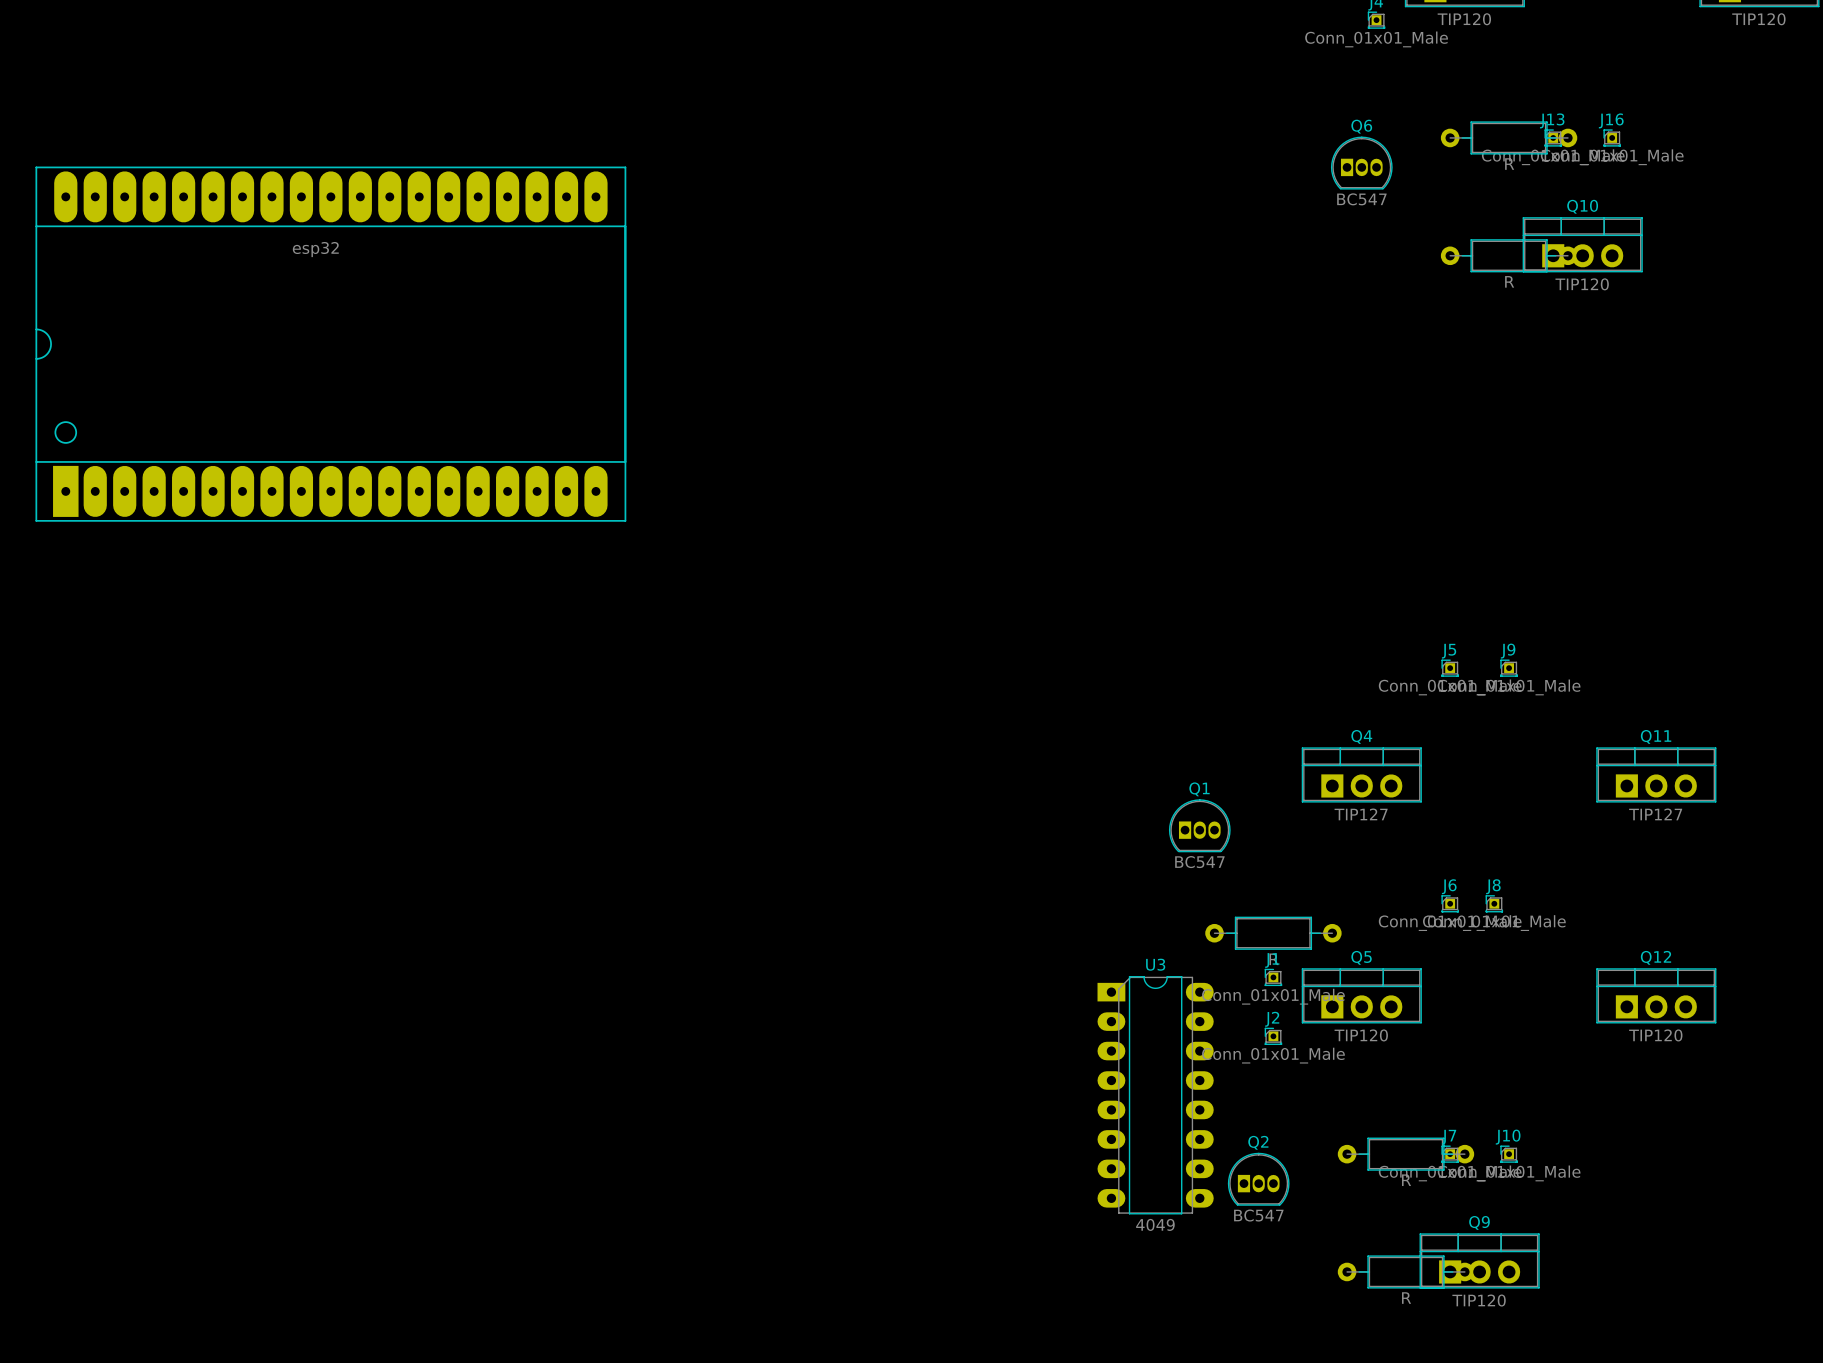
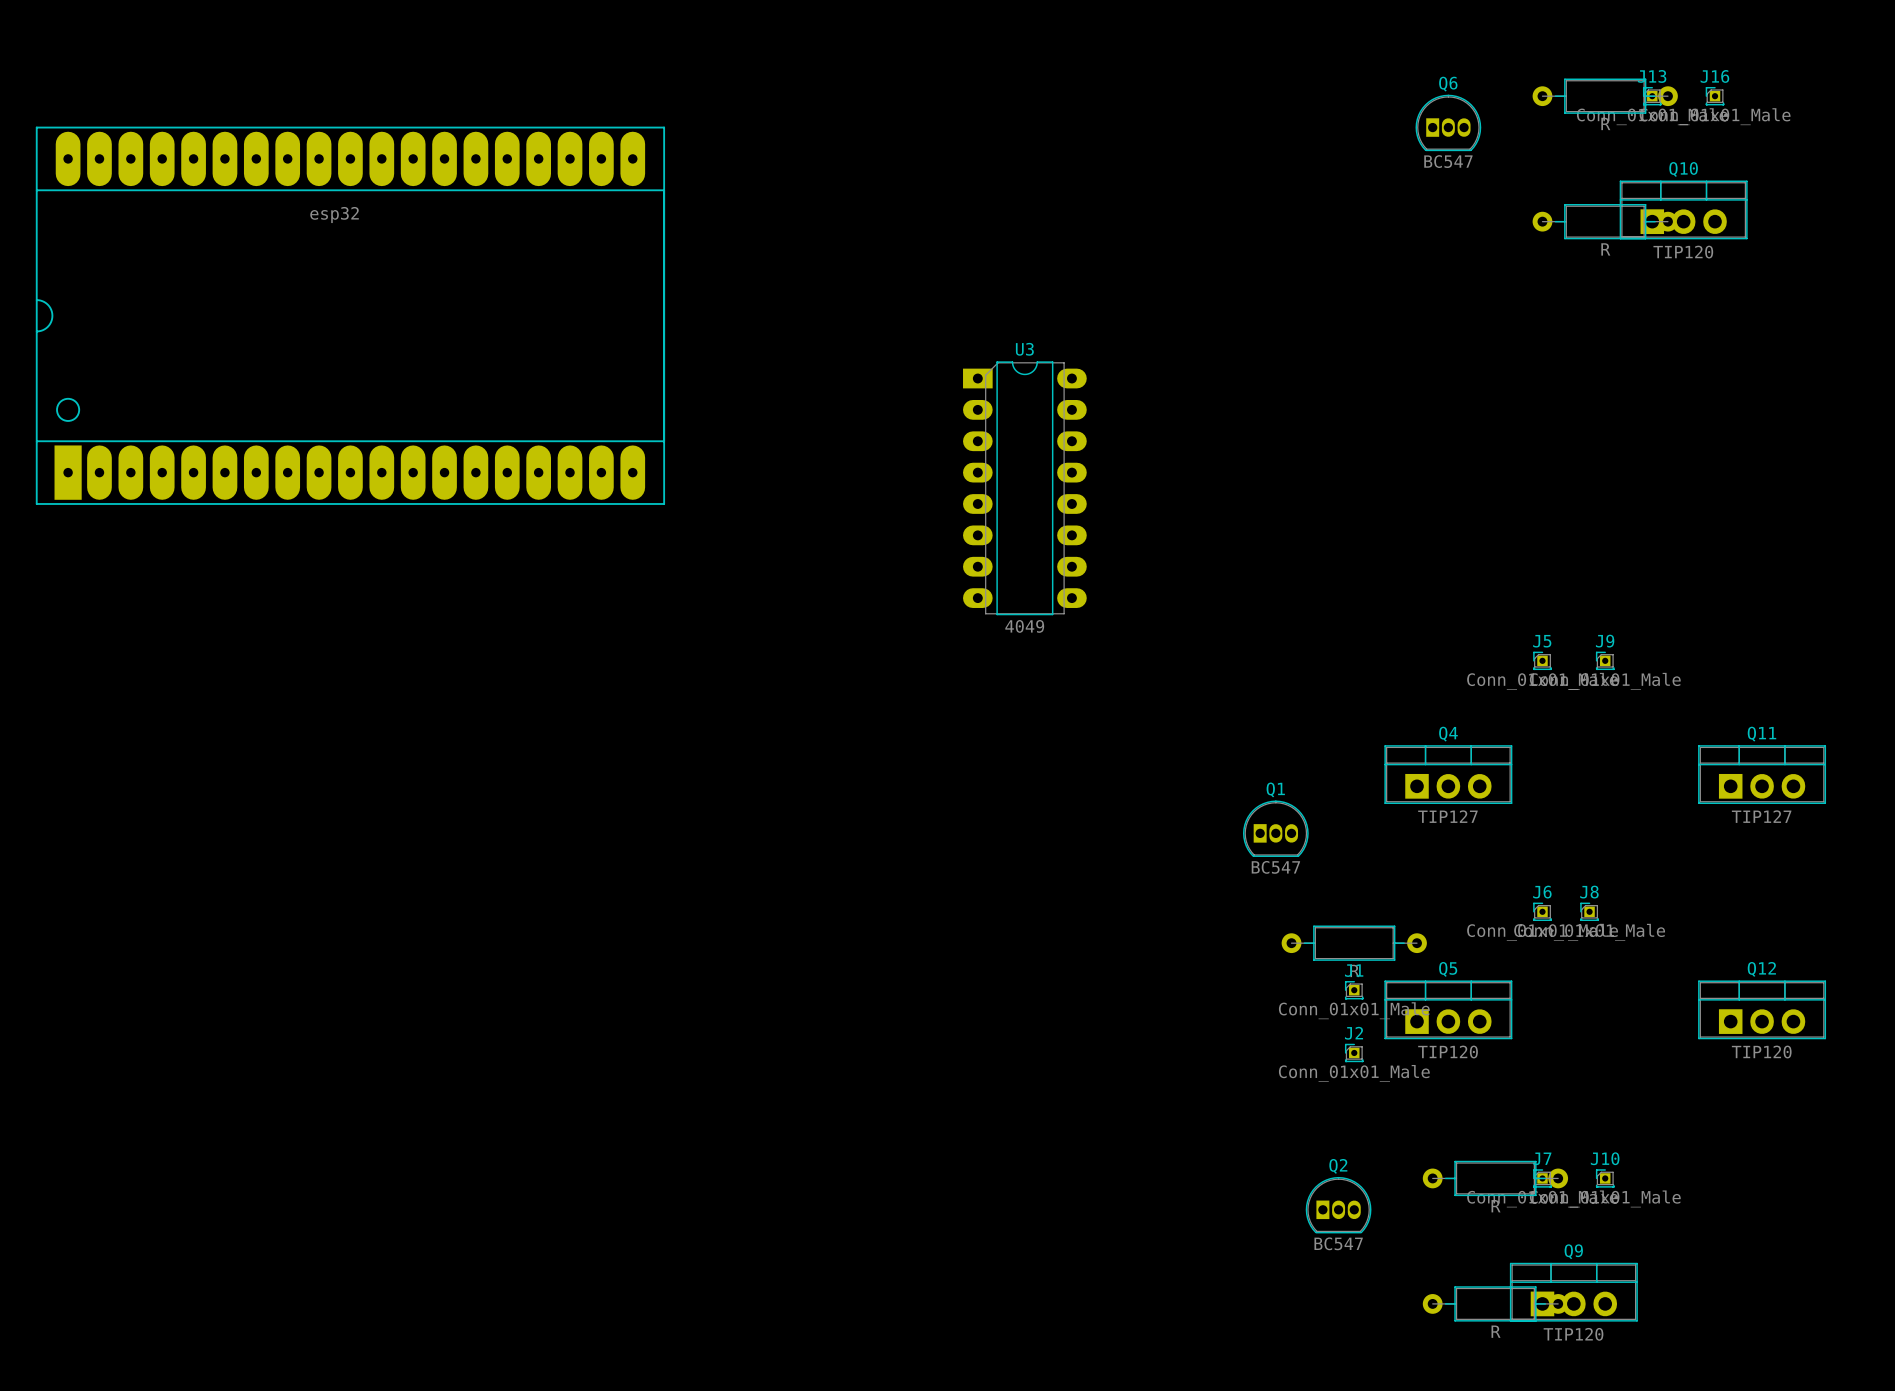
U3 position: (1155, 1095) -> (1024, 488)

